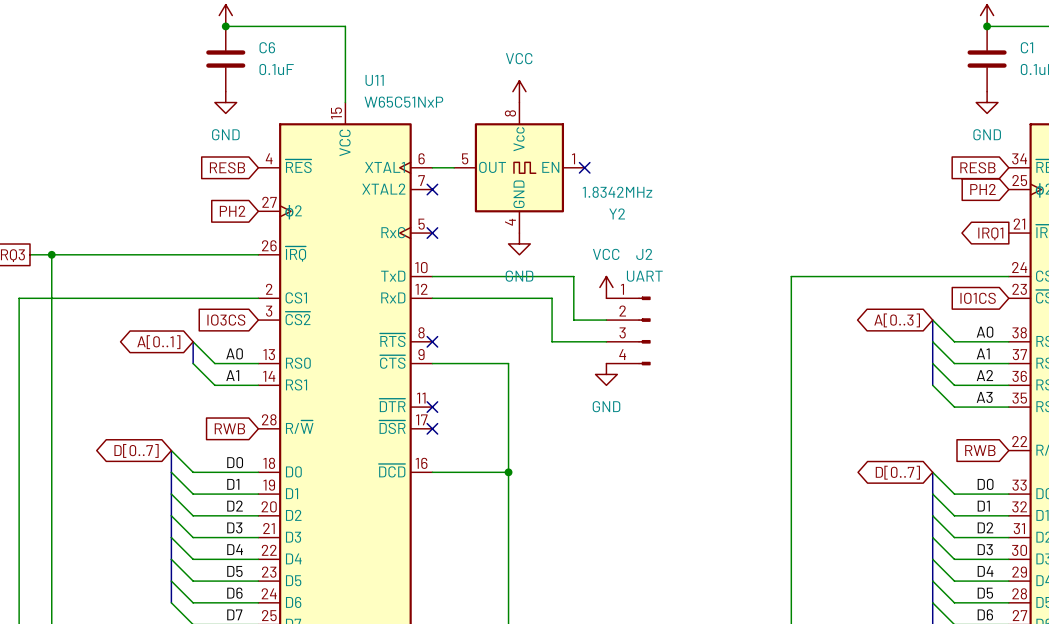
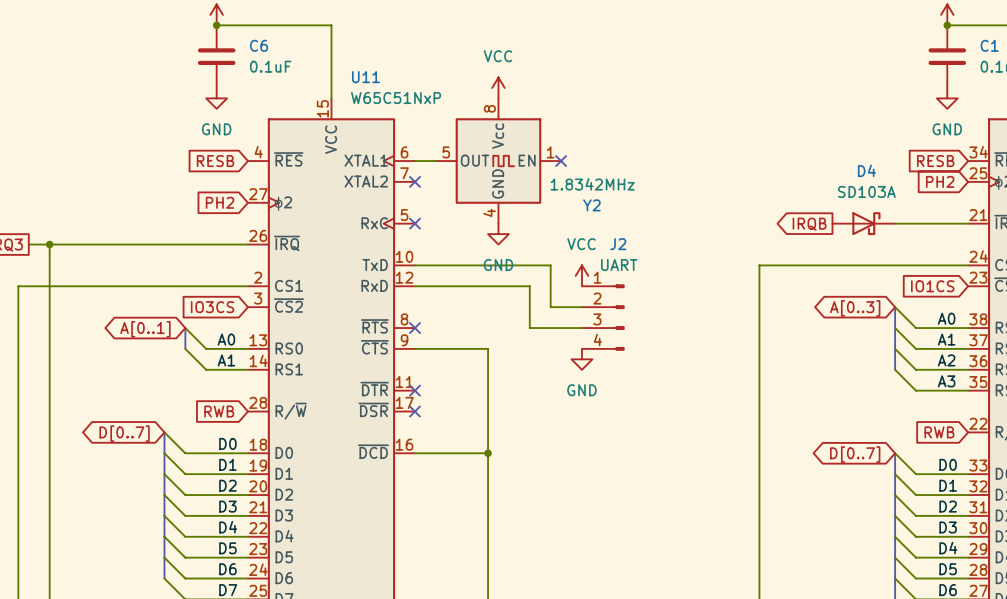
global label: none -> IRQB (809, 224)
D4: none -> SD103A (863, 223)
wire: none -> (895, 223) (968, 223)
global label: IRQ1 (990, 233) -> none

